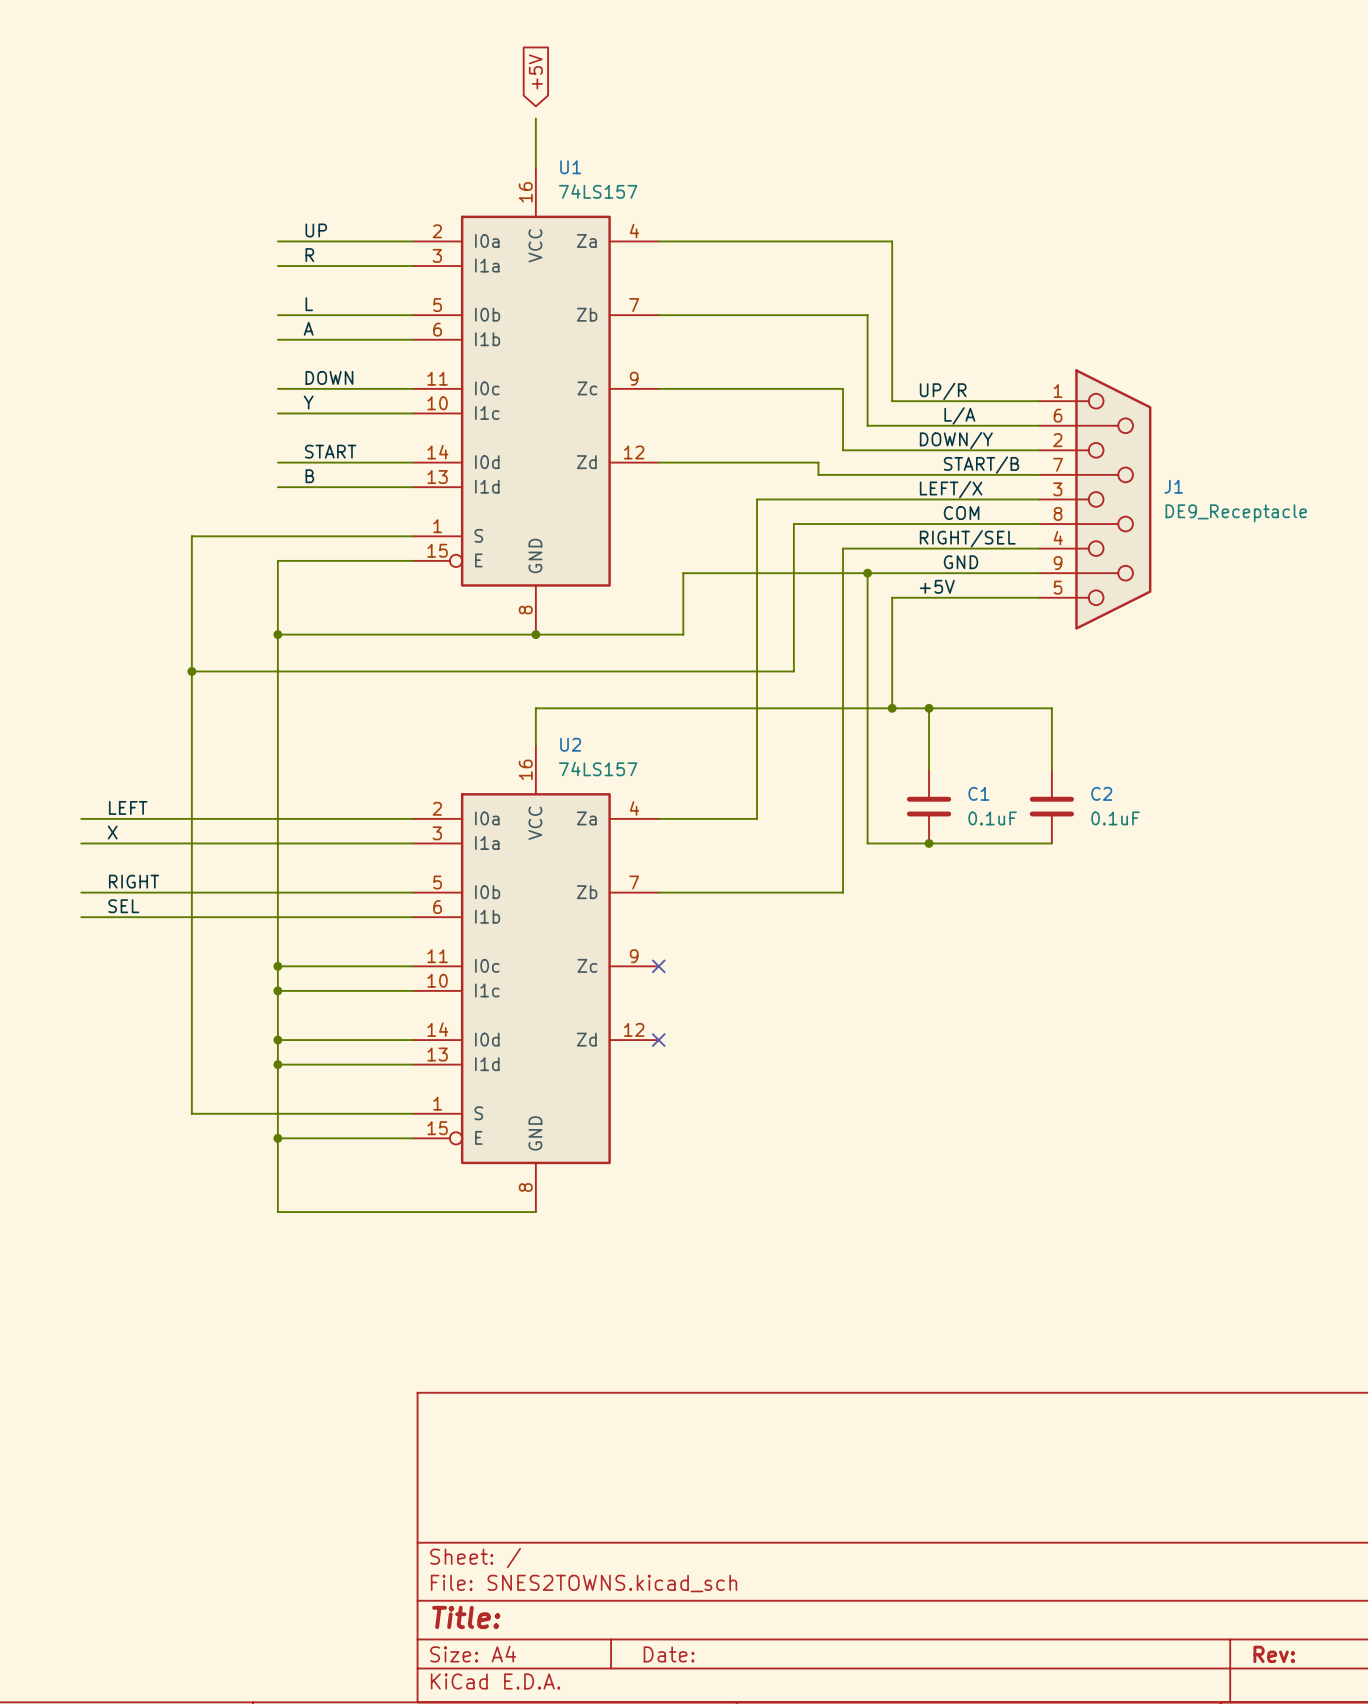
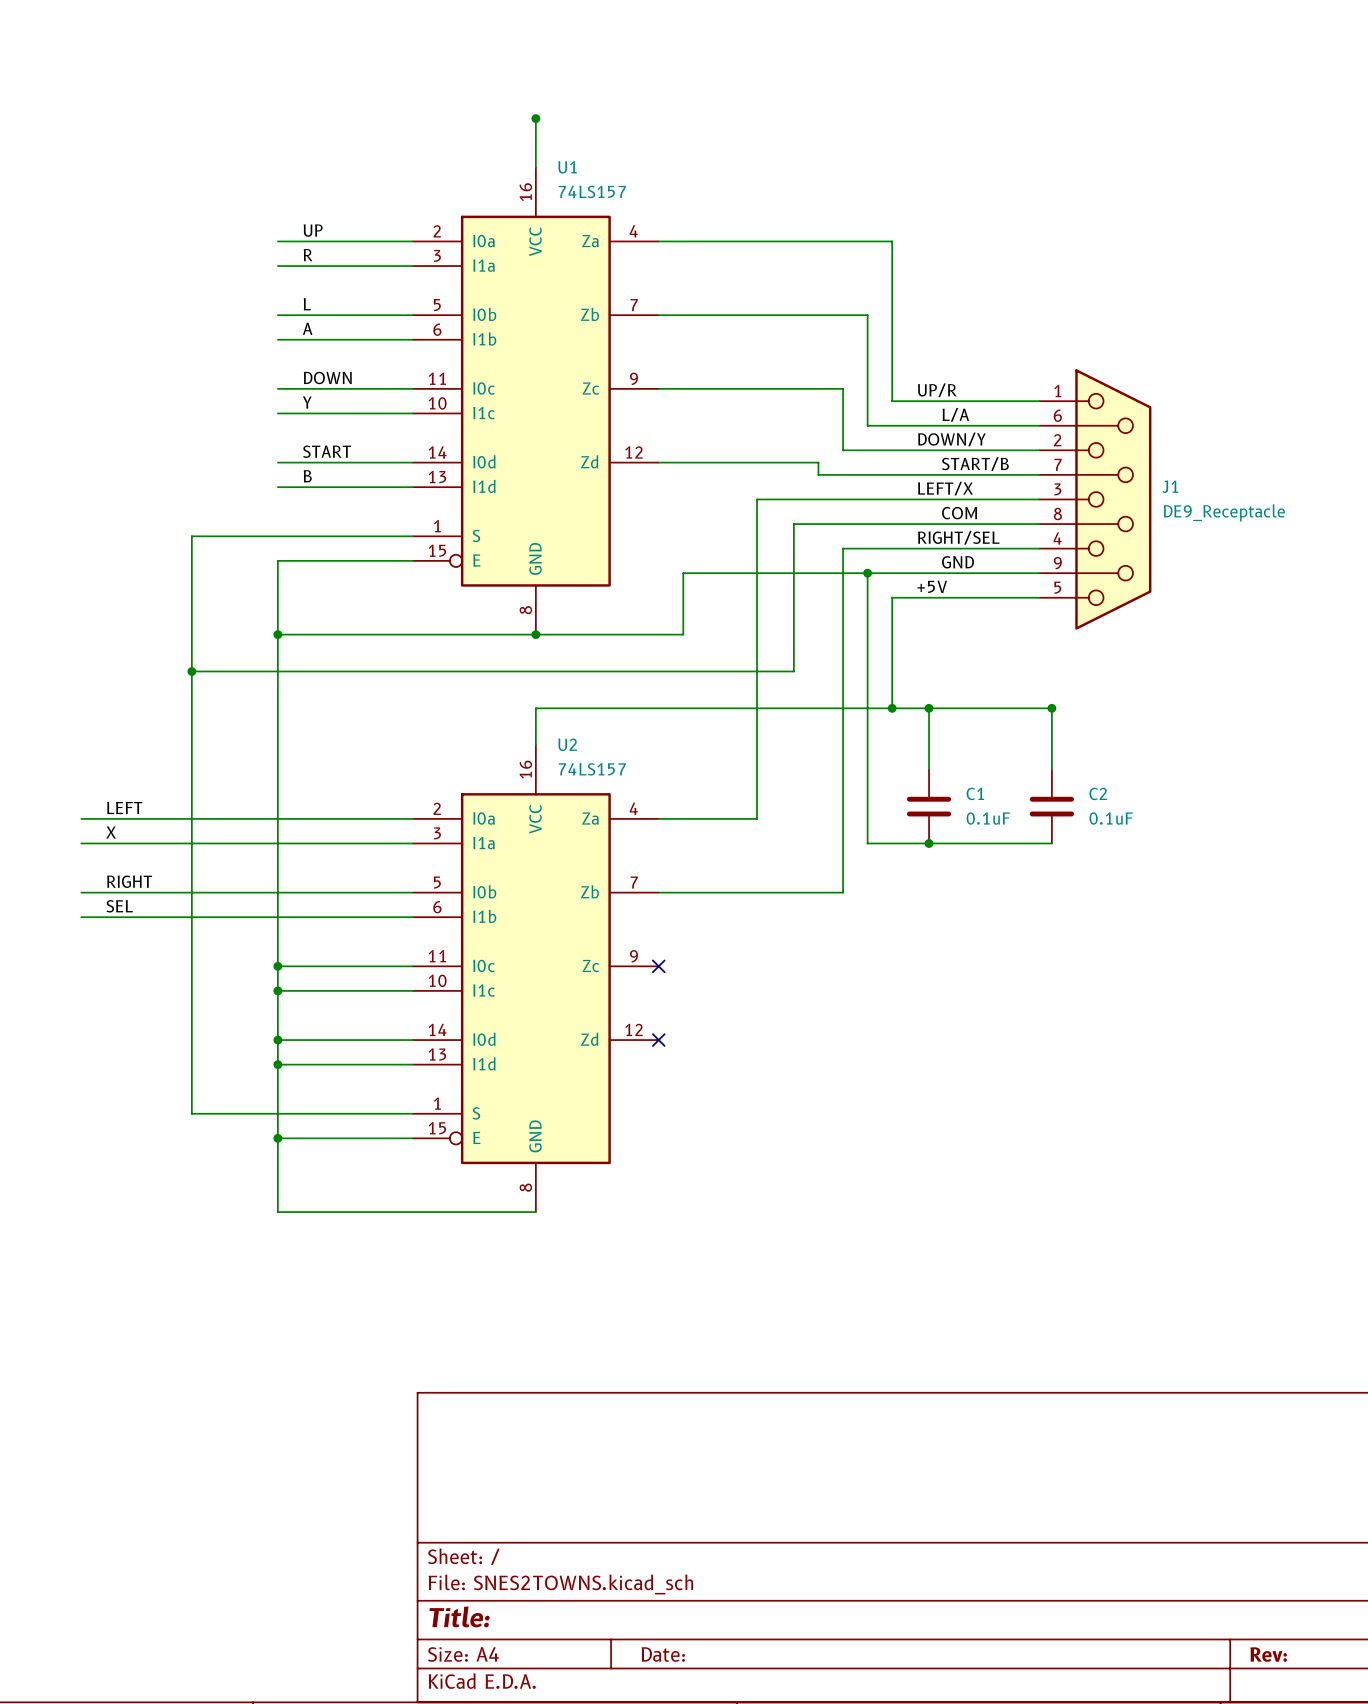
global label: +5V (535, 71) -> none
junction: none -> (535, 118)
junction: none -> (1051, 708)

